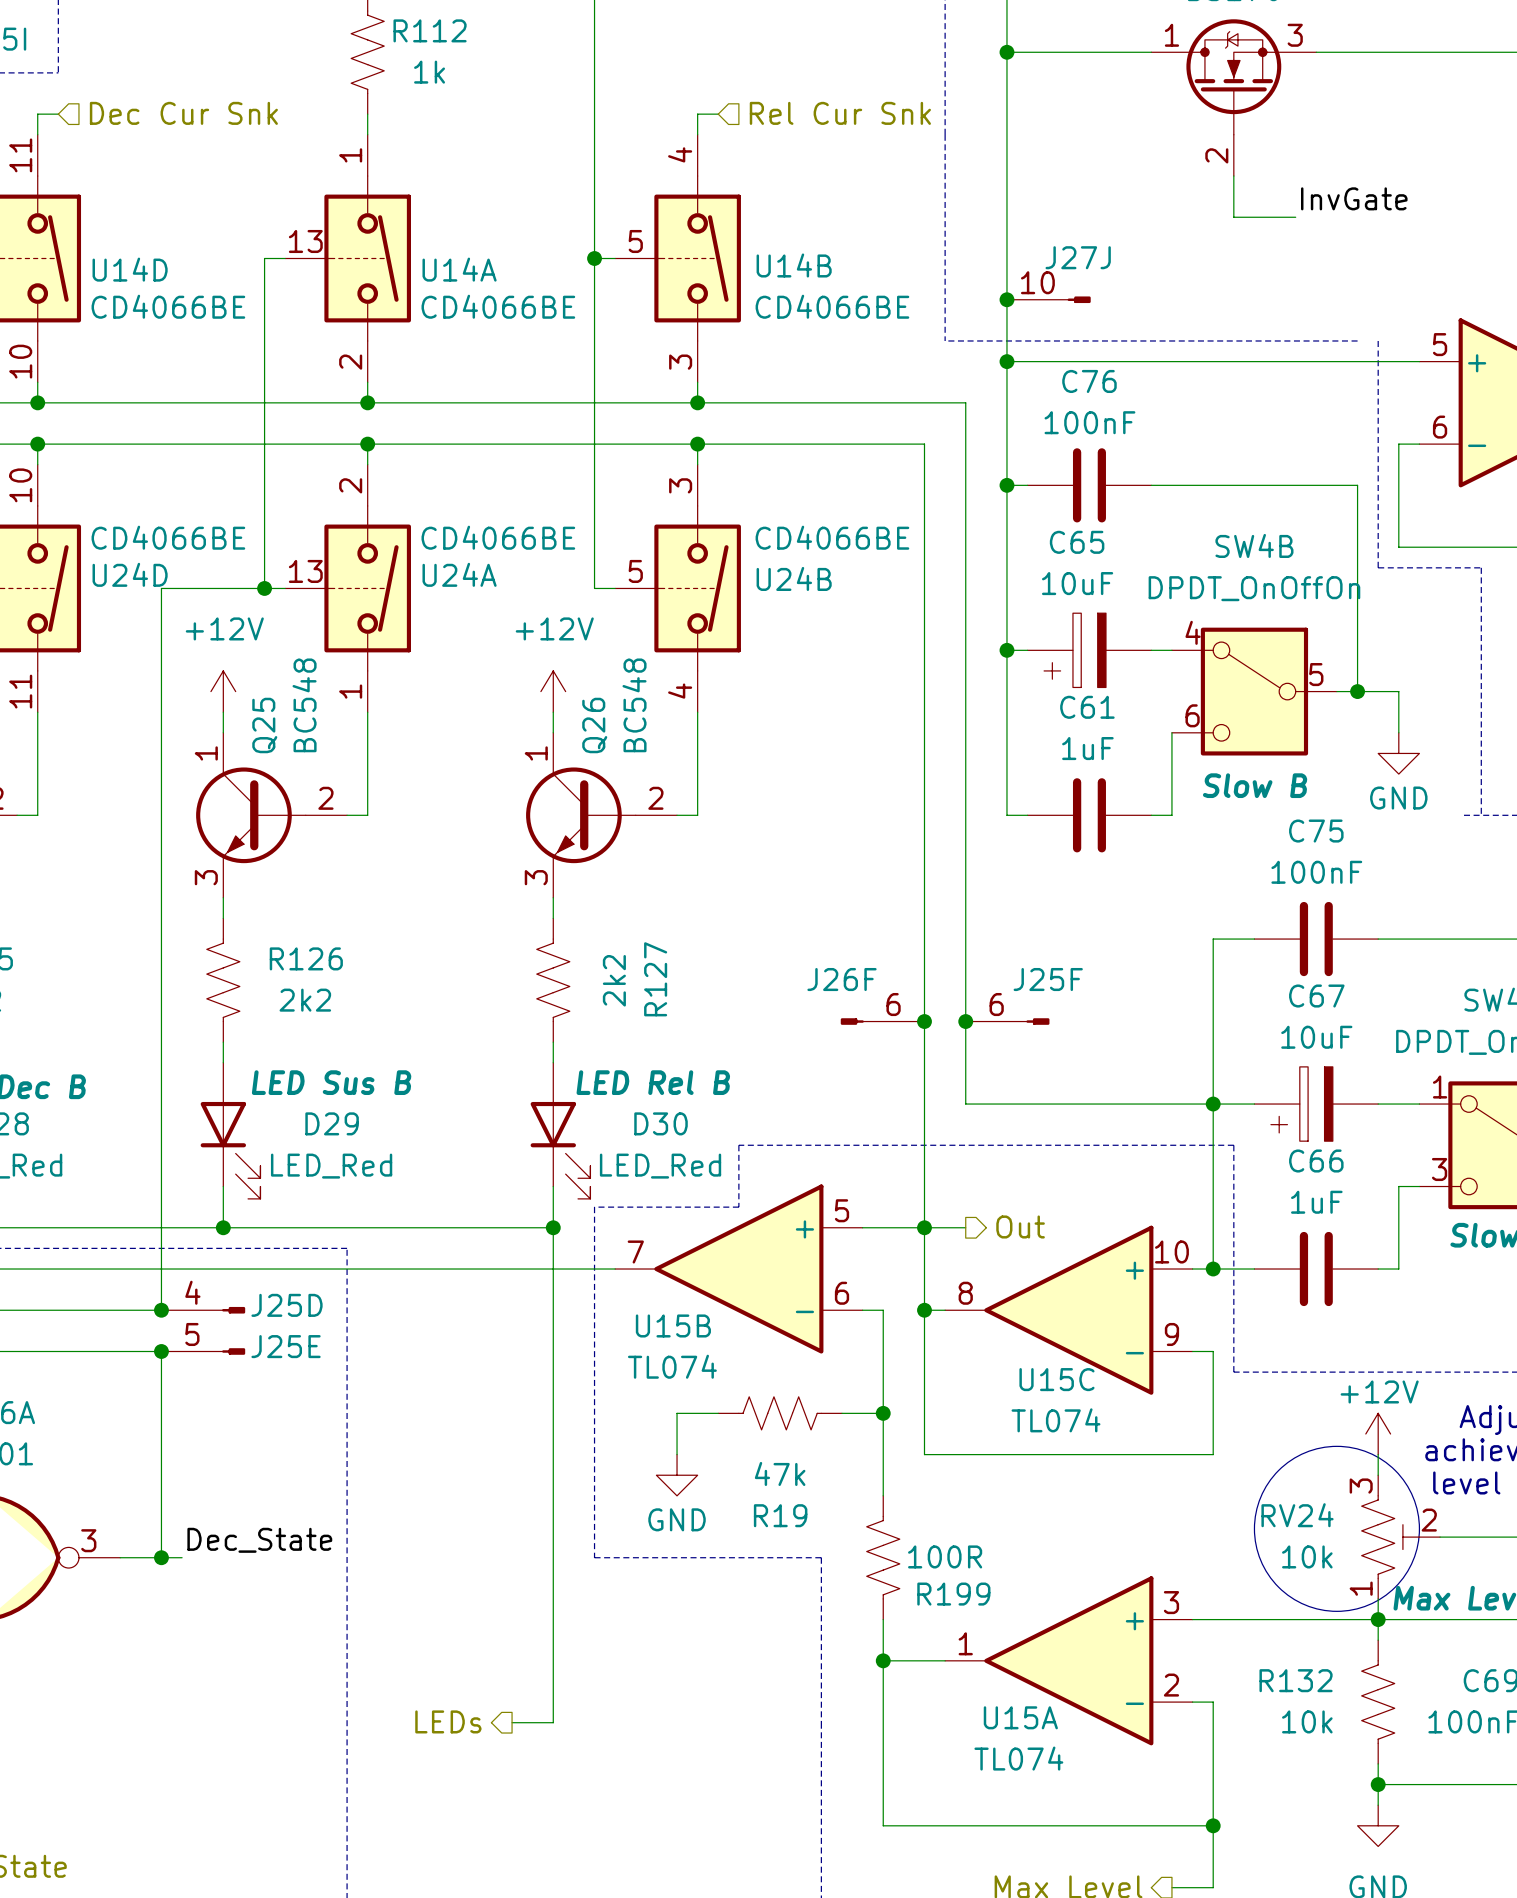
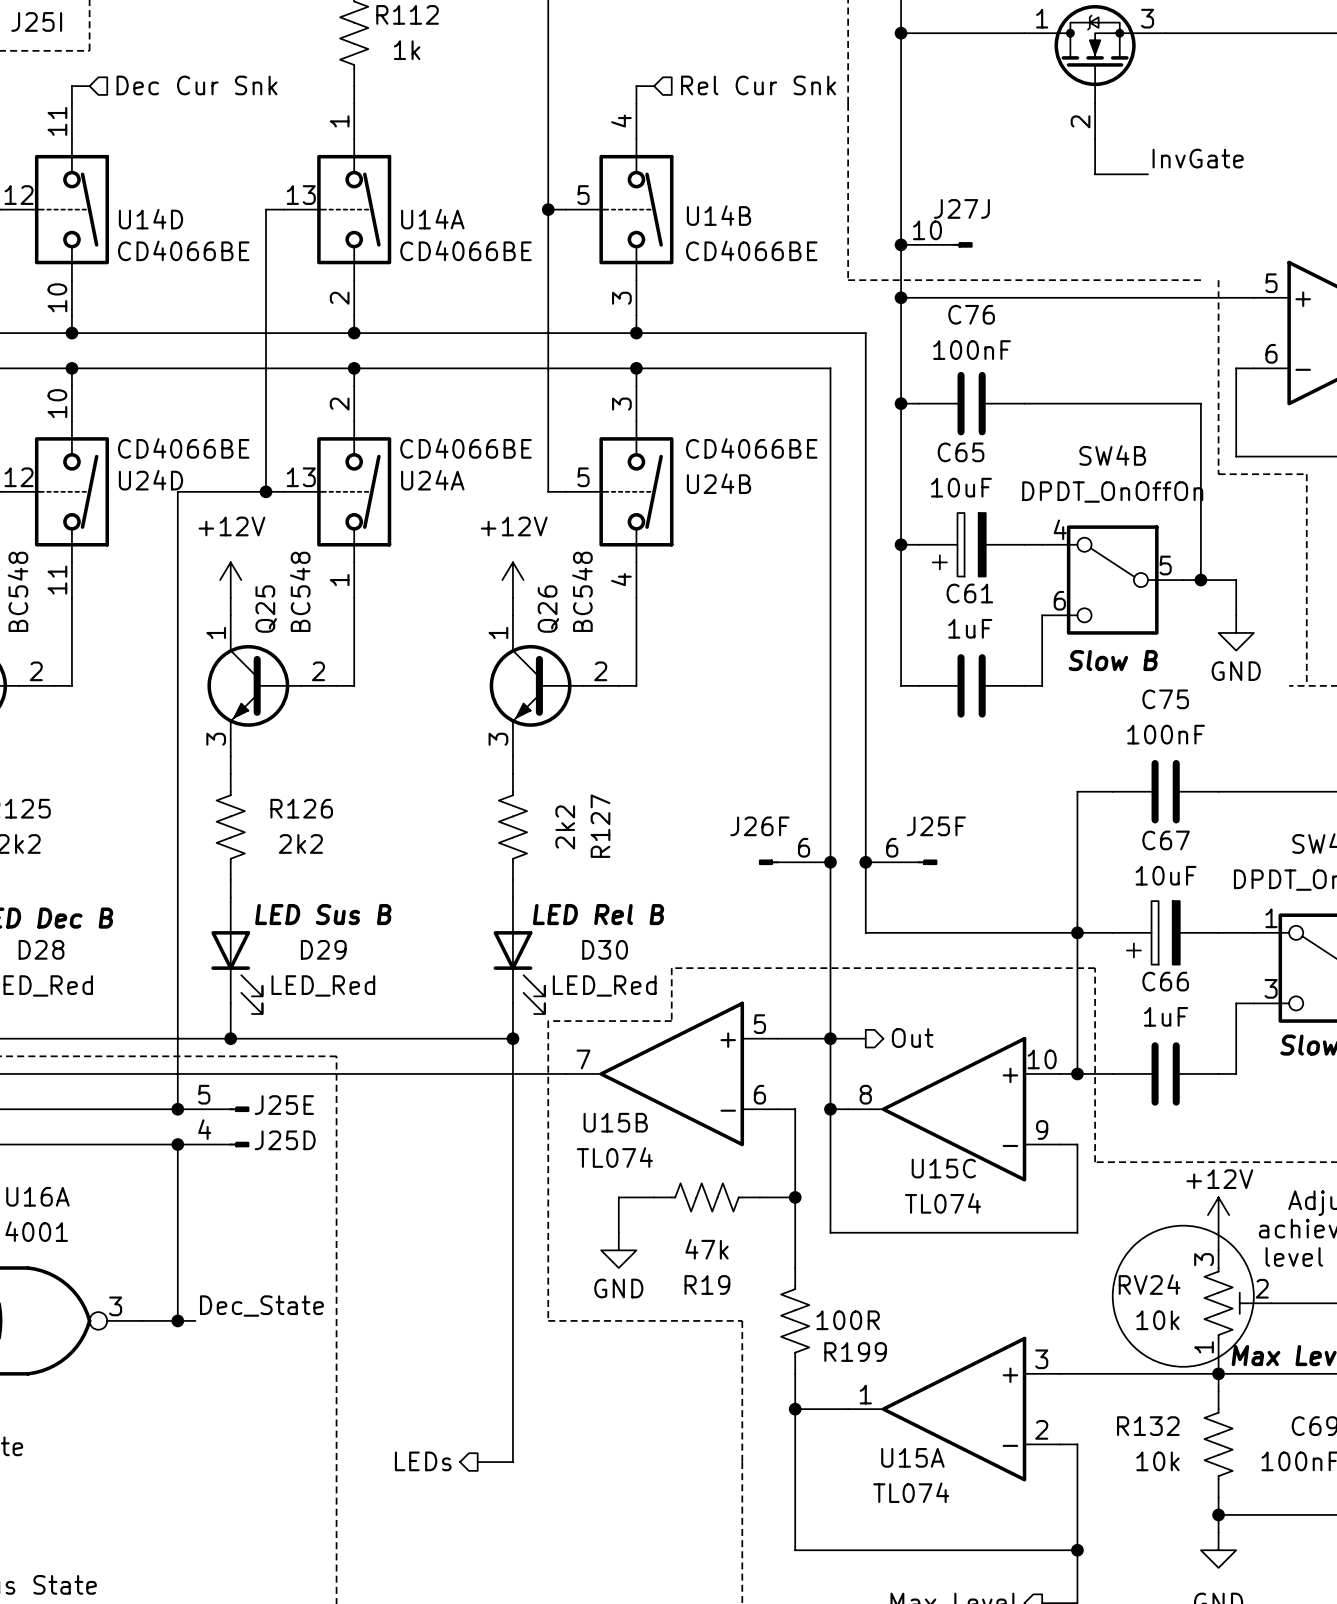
J25D position: (203, 1310) -> (213, 1144)
J25E position: (203, 1351) -> (213, 1109)

